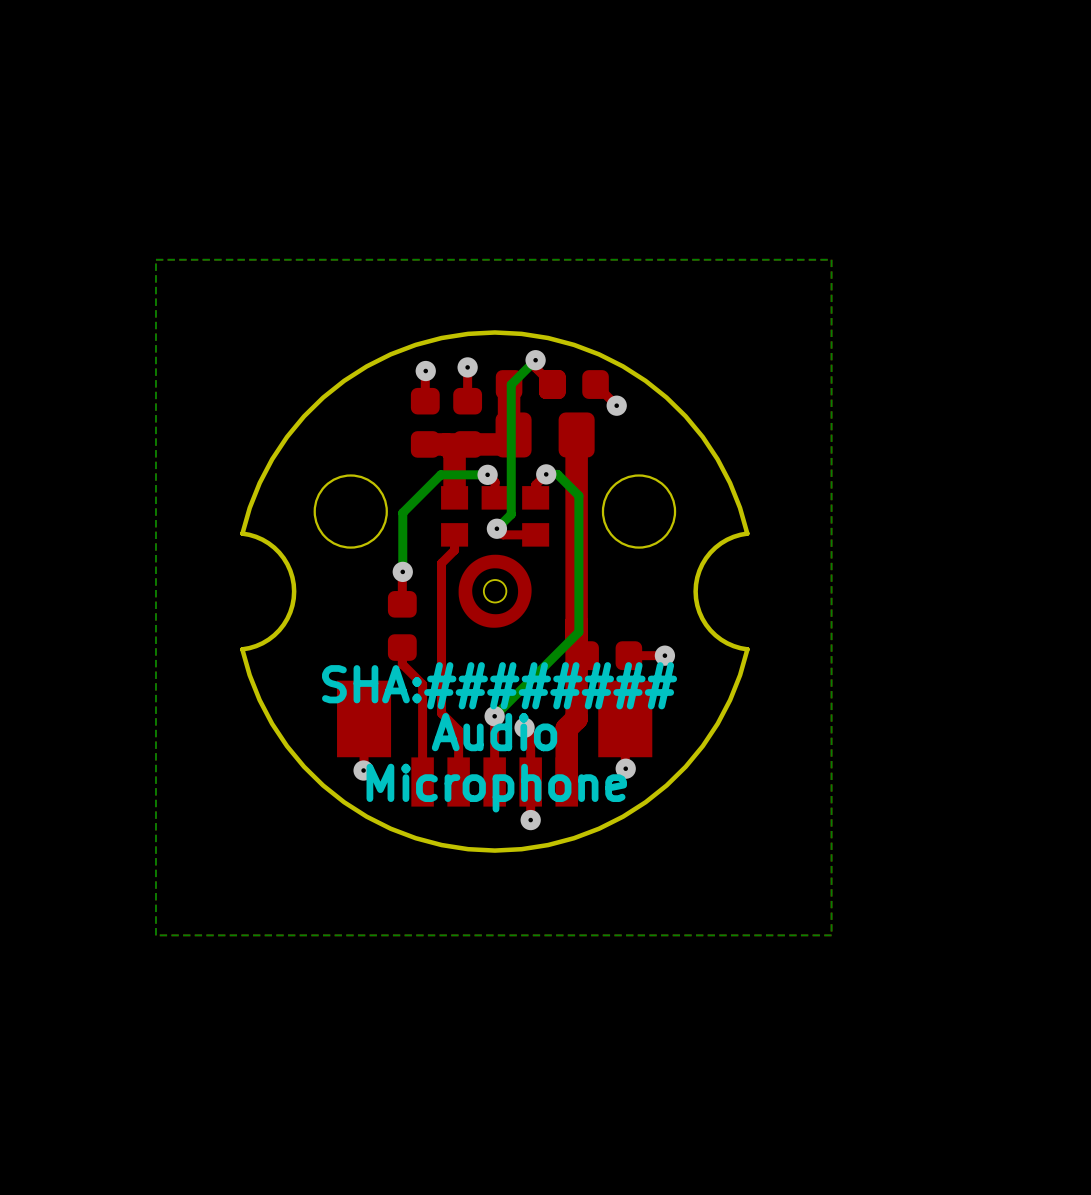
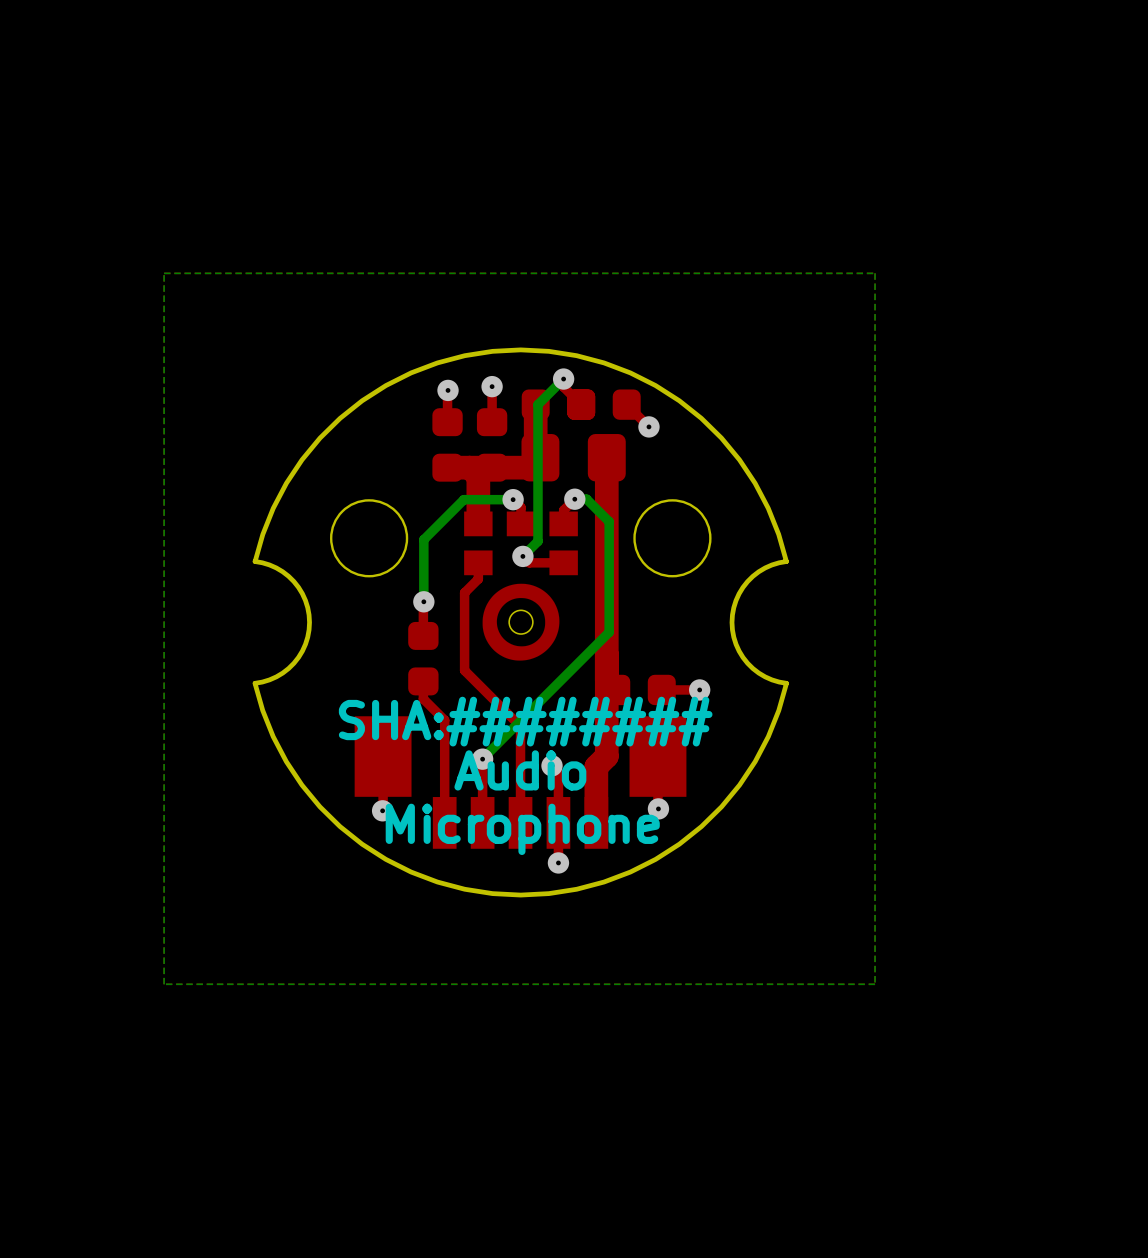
bottom track: (578, 600) (578, 632) (494, 716) -> (609, 632) (482, 758)
top track: (441, 637) (441, 713) (458, 730) -> (464, 670) (520, 726) (520, 753)
via position: (494, 716) -> (482, 759)

